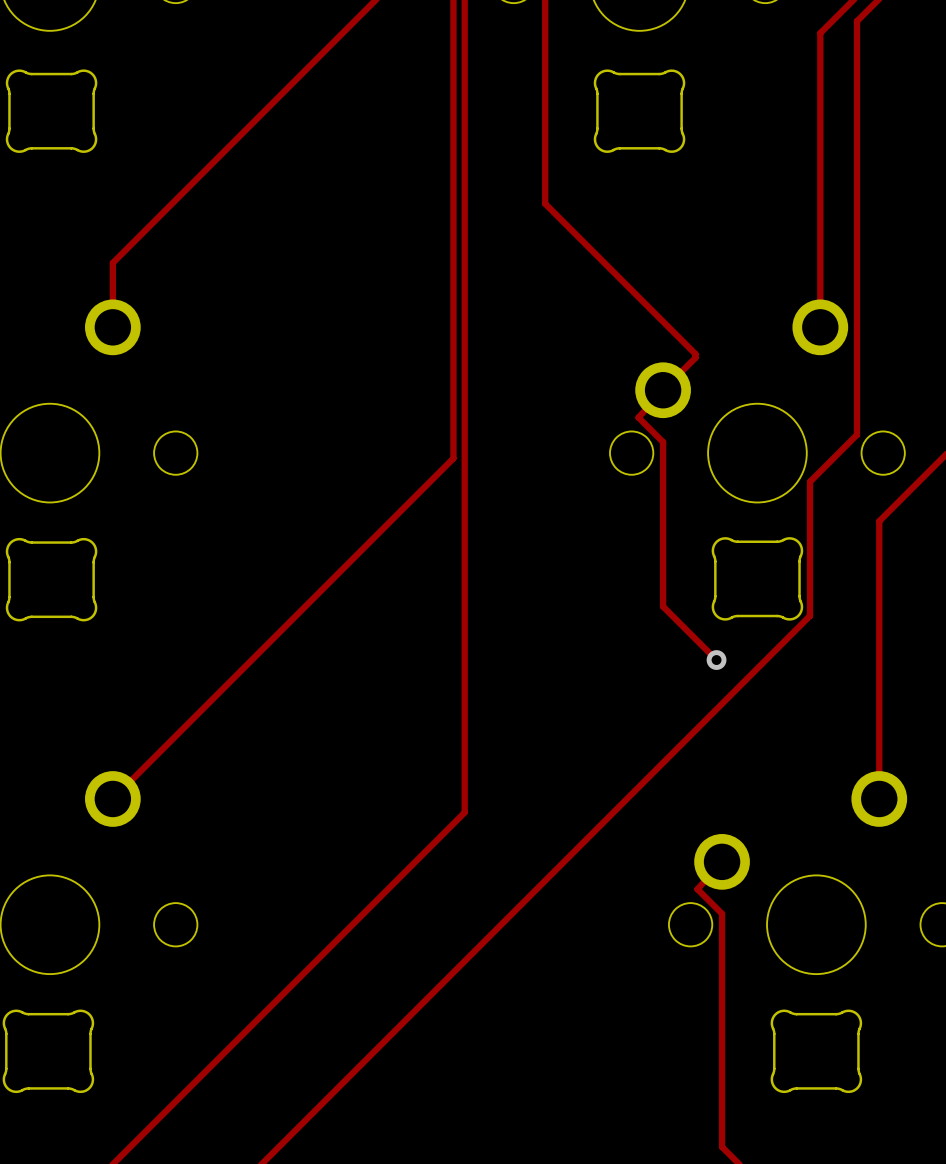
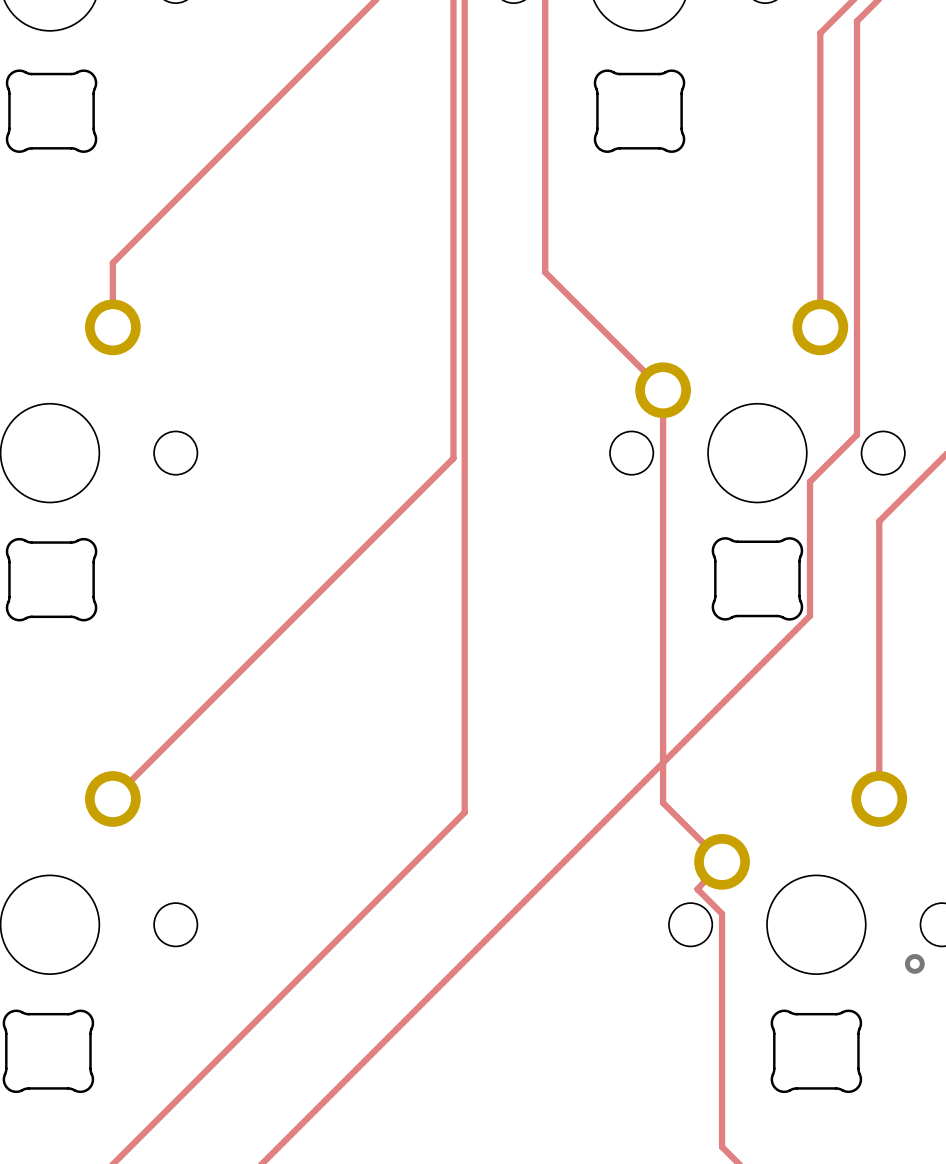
track: (545, 203) (695, 354) (695, 357) (638, 417) (663, 442) -> (545, 203) (545, 272) (663, 390) (663, 442)
track: (663, 606) (716, 660) -> (663, 606) (663, 802) (722, 861)
via: (716, 660) -> none
via: none -> (914, 963)

